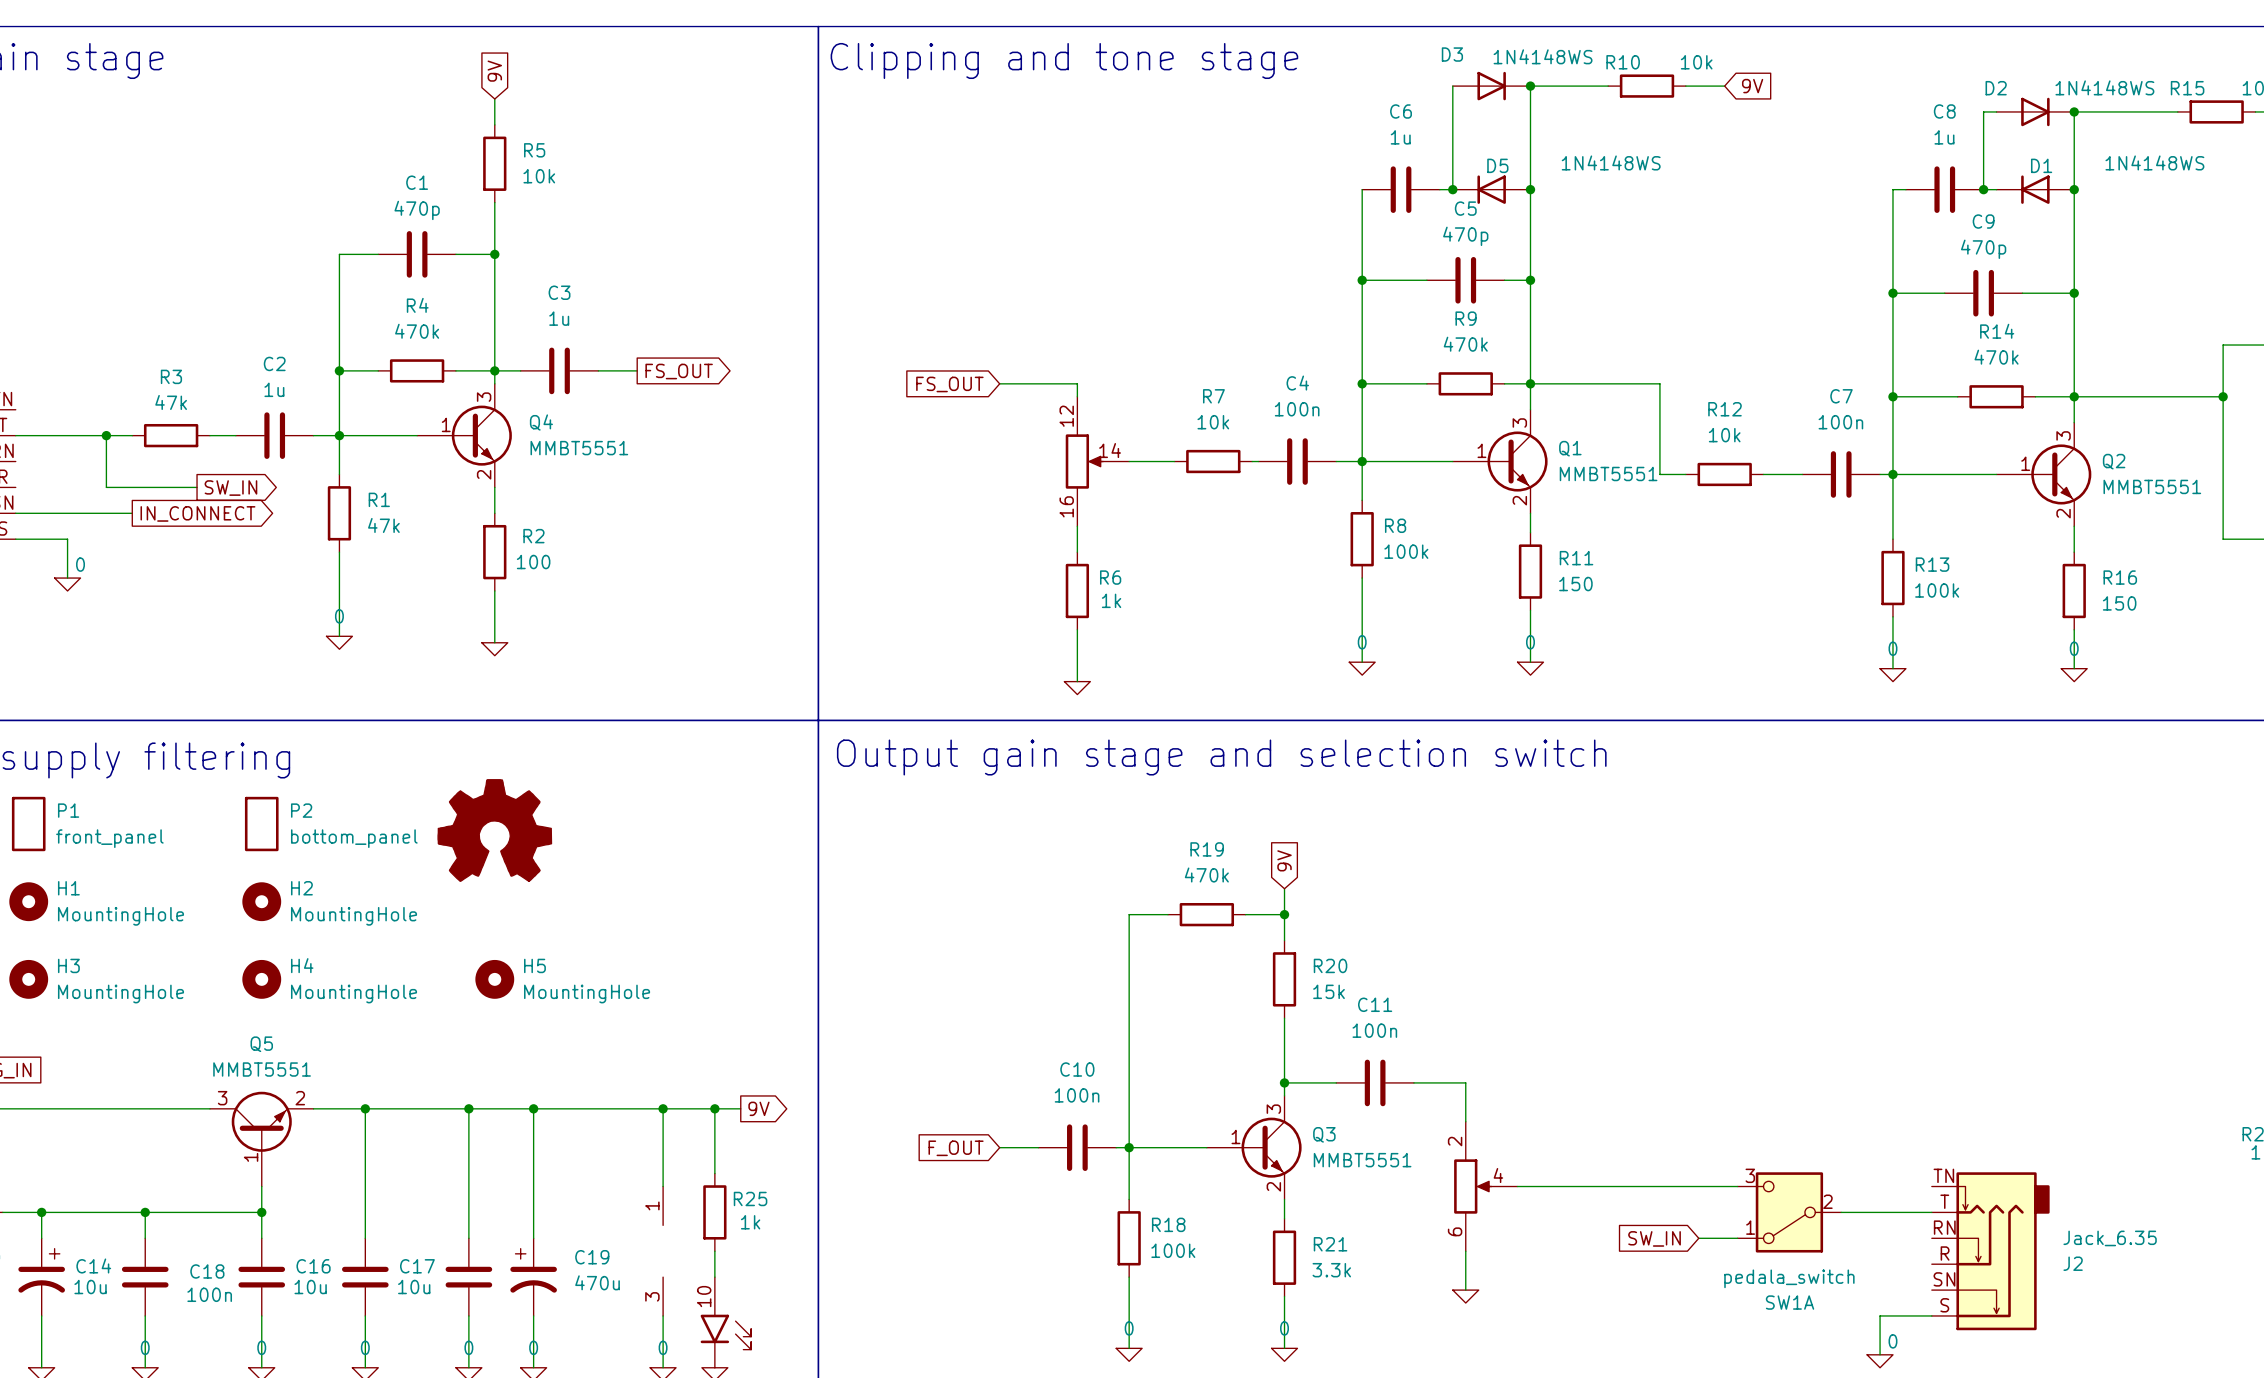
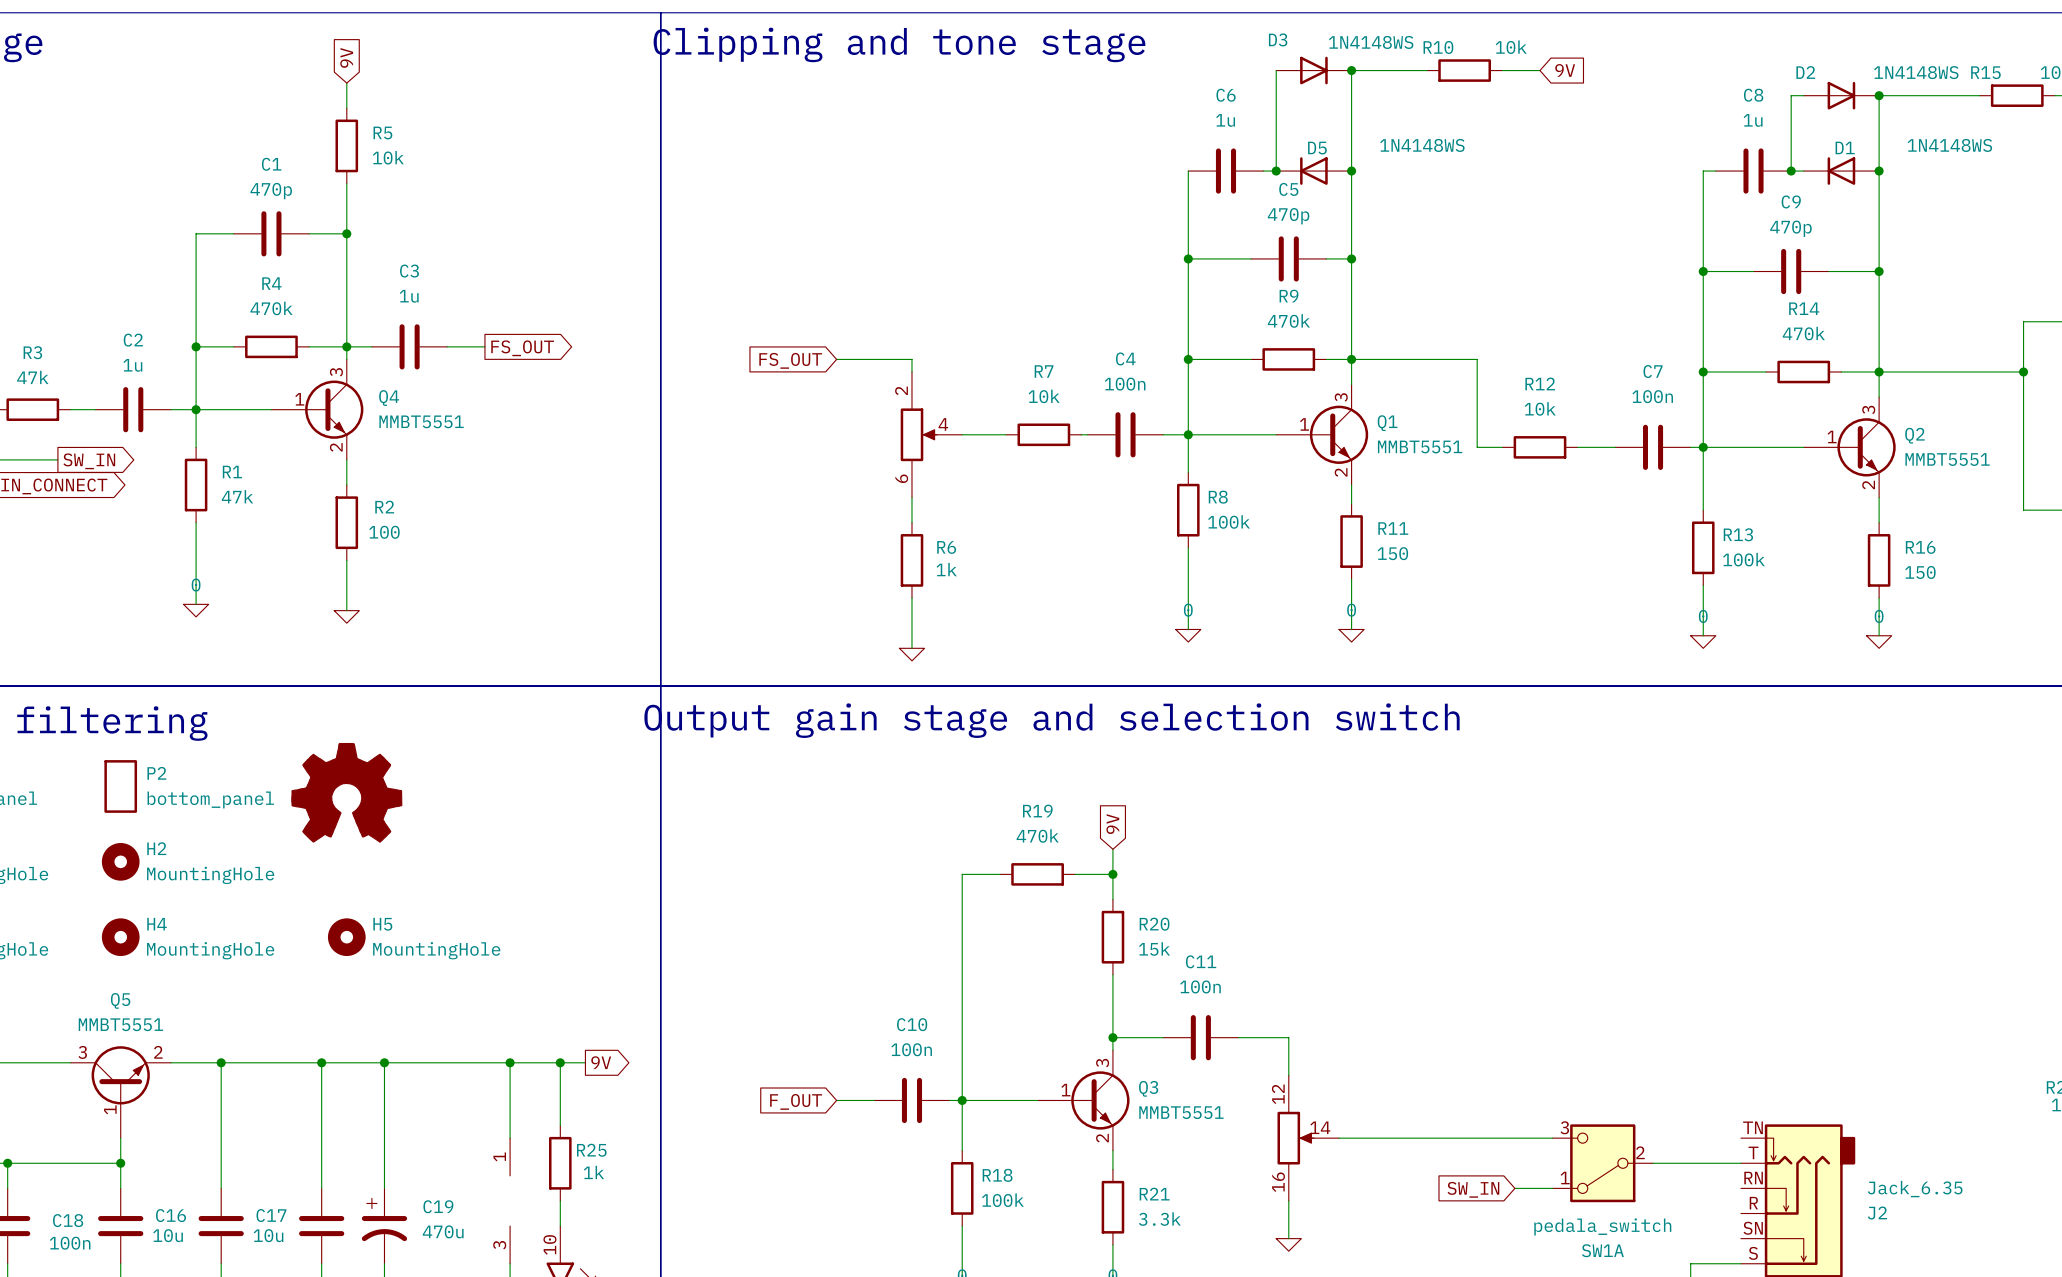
part pin number: 12 (1066, 416) -> 2 (901, 390)
part pin number: 14 (1110, 450) -> 4 (943, 424)
part pin number: 16 (1066, 506) -> 6 (901, 478)
part pin number: 2 (1455, 1141) -> 12 (1278, 1094)
part pin number: 4 (1498, 1175) -> 14 (1320, 1127)
part pin number: 6 (1455, 1231) -> 16 (1278, 1182)

